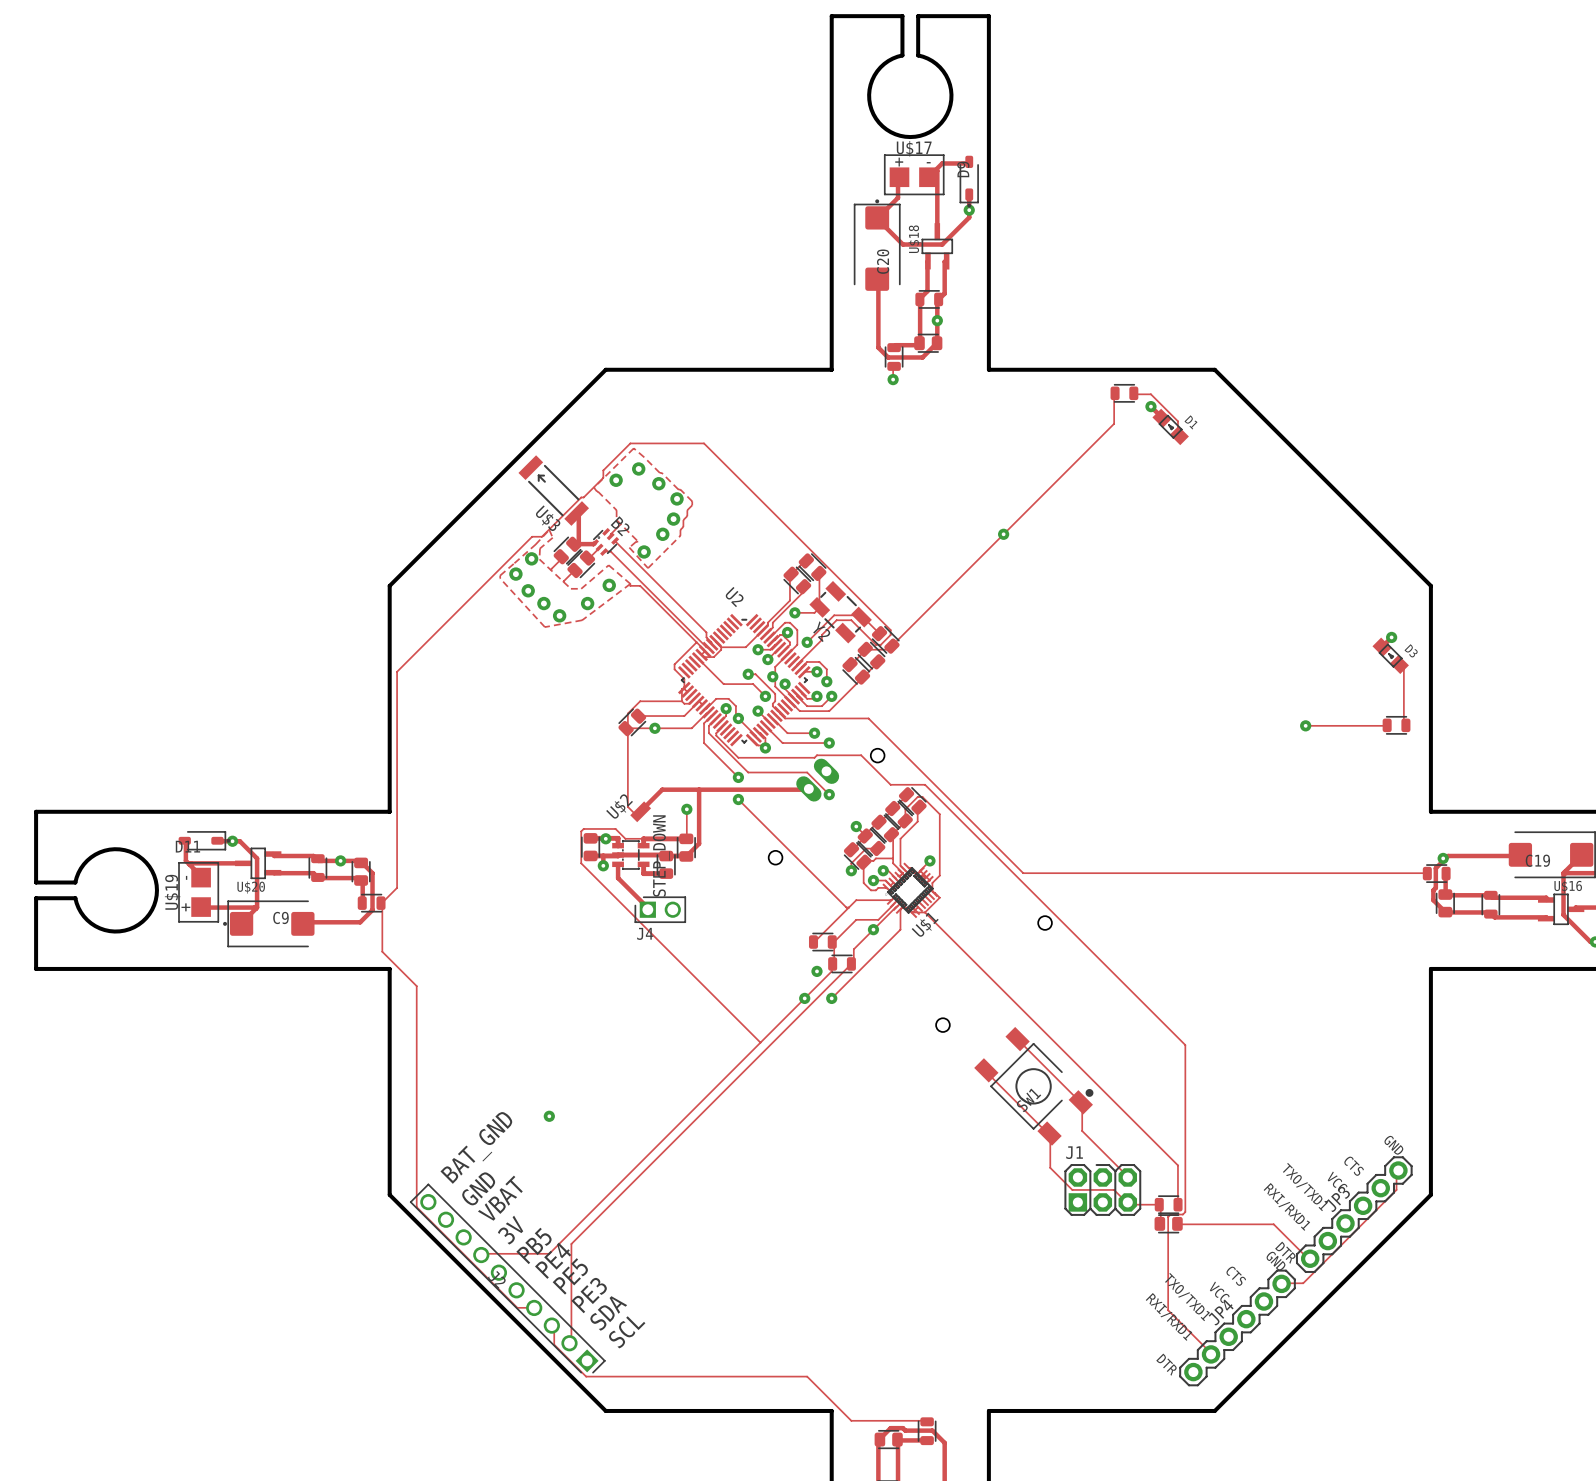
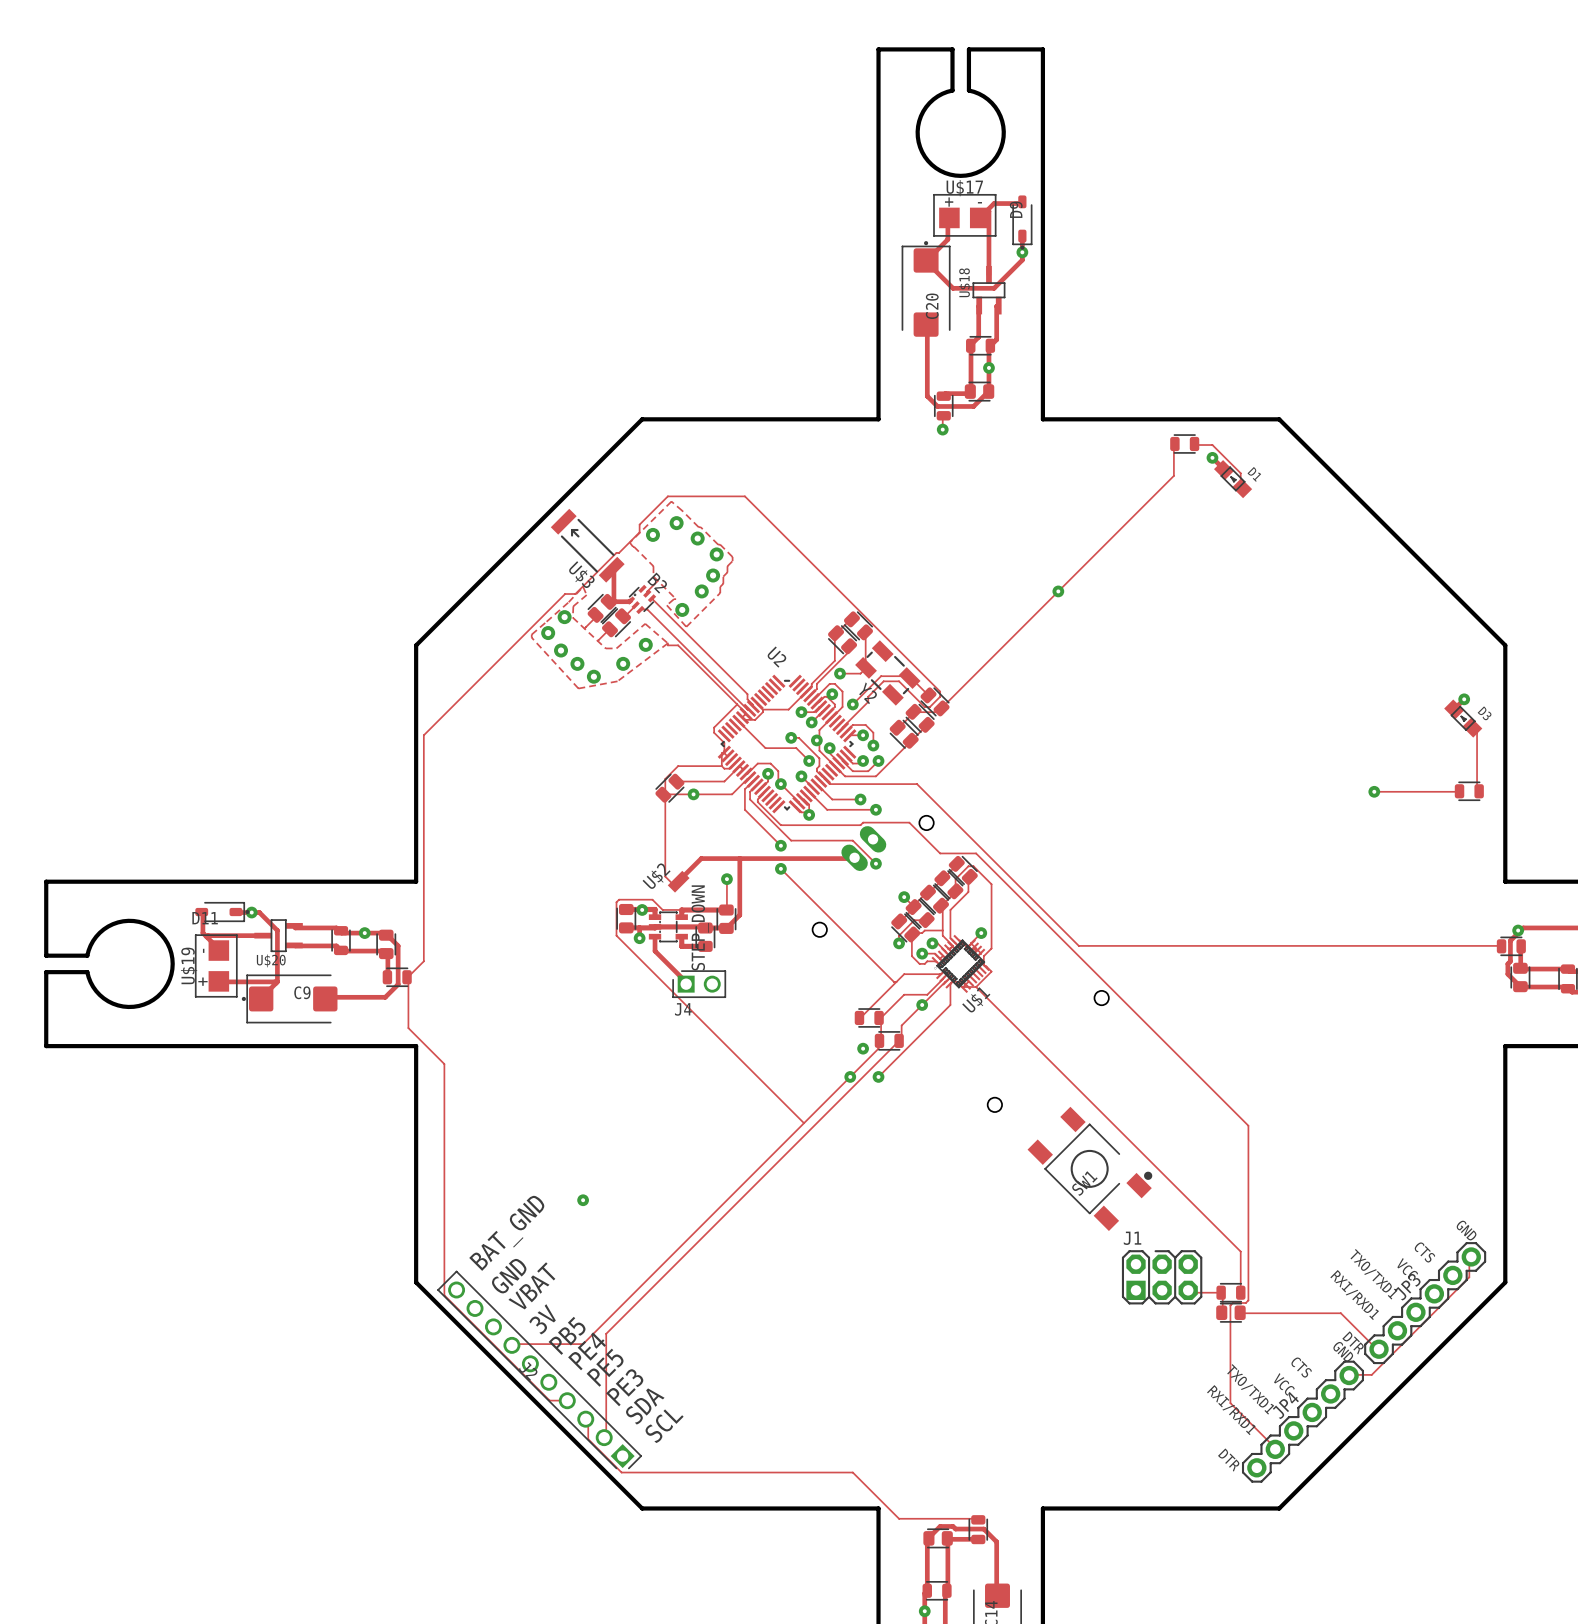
track: (1017, 1039) (1082, 1104) (1082, 1131) (1127, 1177) -> none
track: (986, 1070) (1049, 1133) (1050, 1167) (1072, 1189) (1114, 1189) (1127, 1202) -> none

